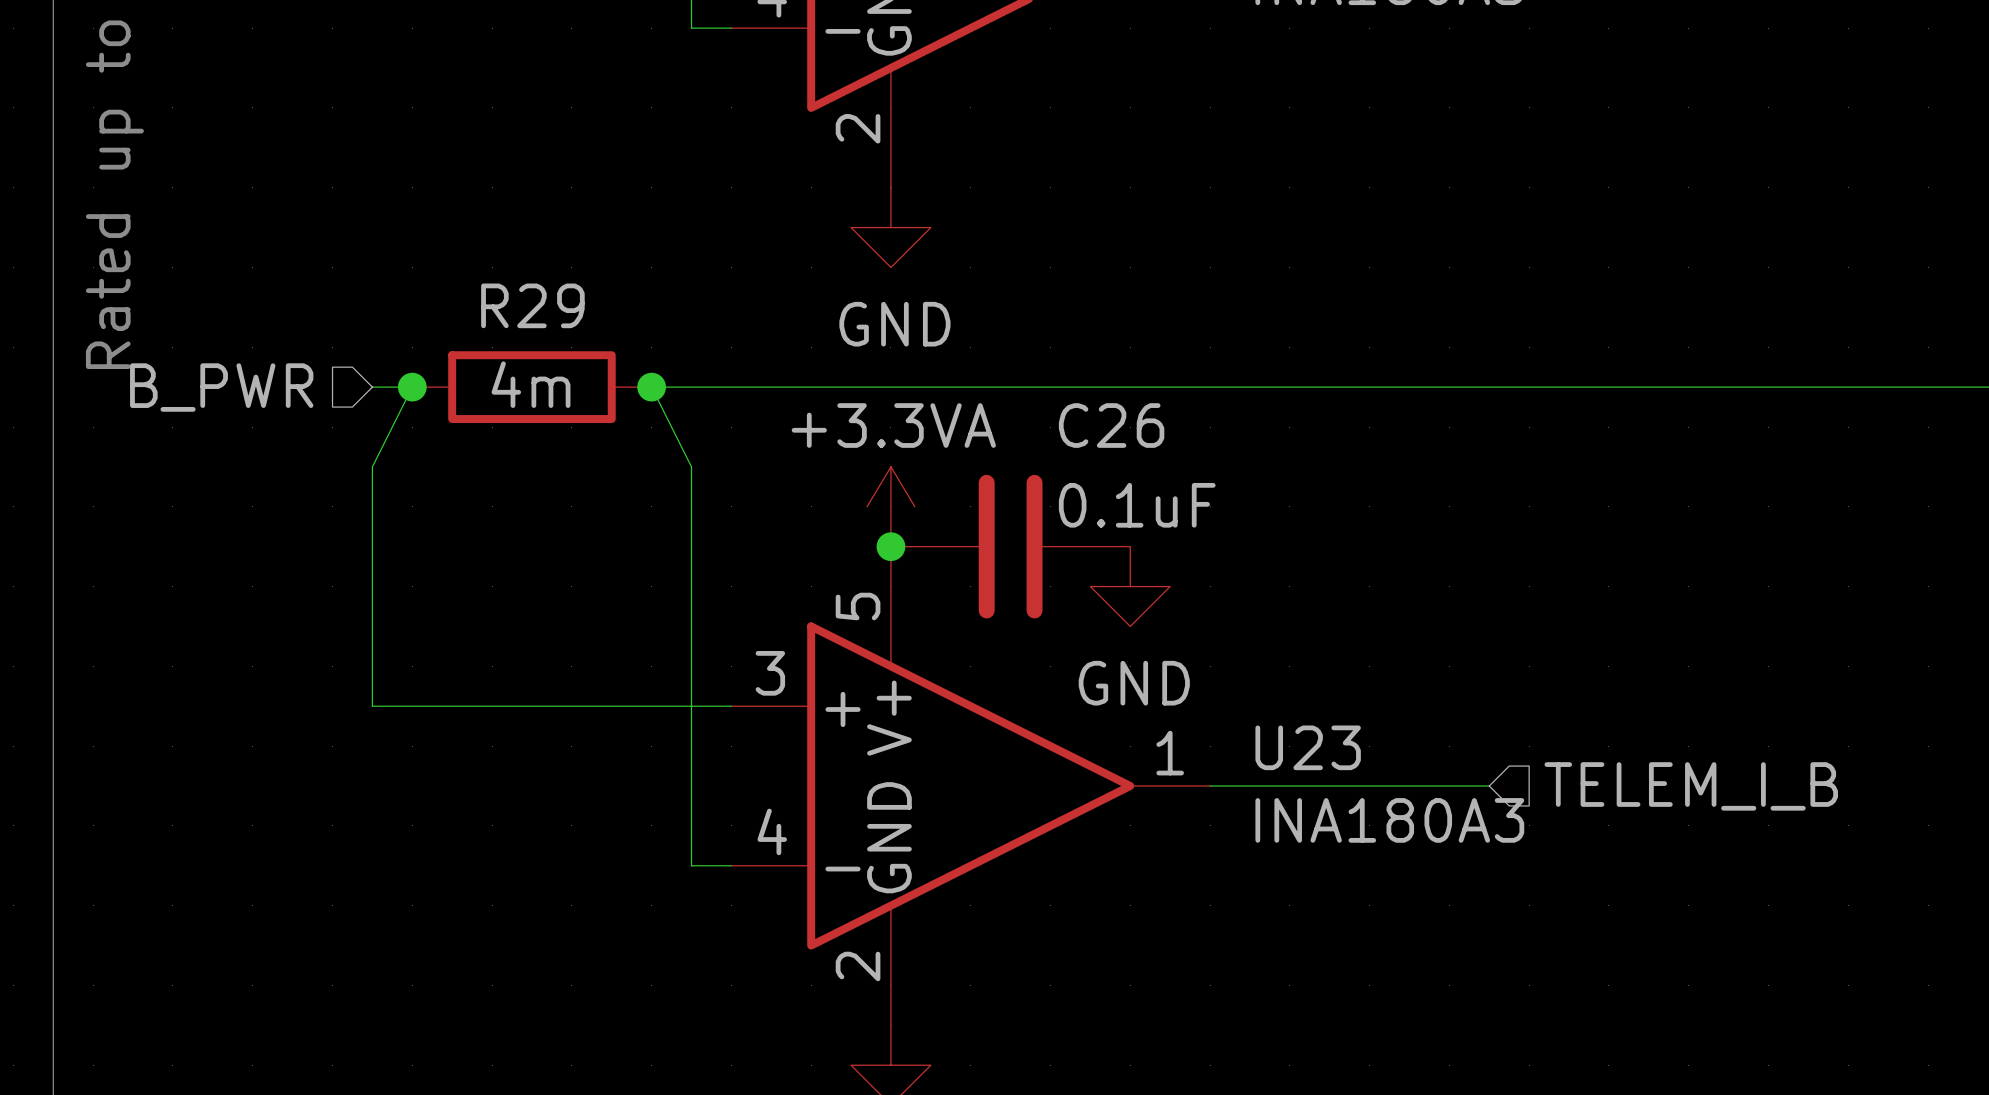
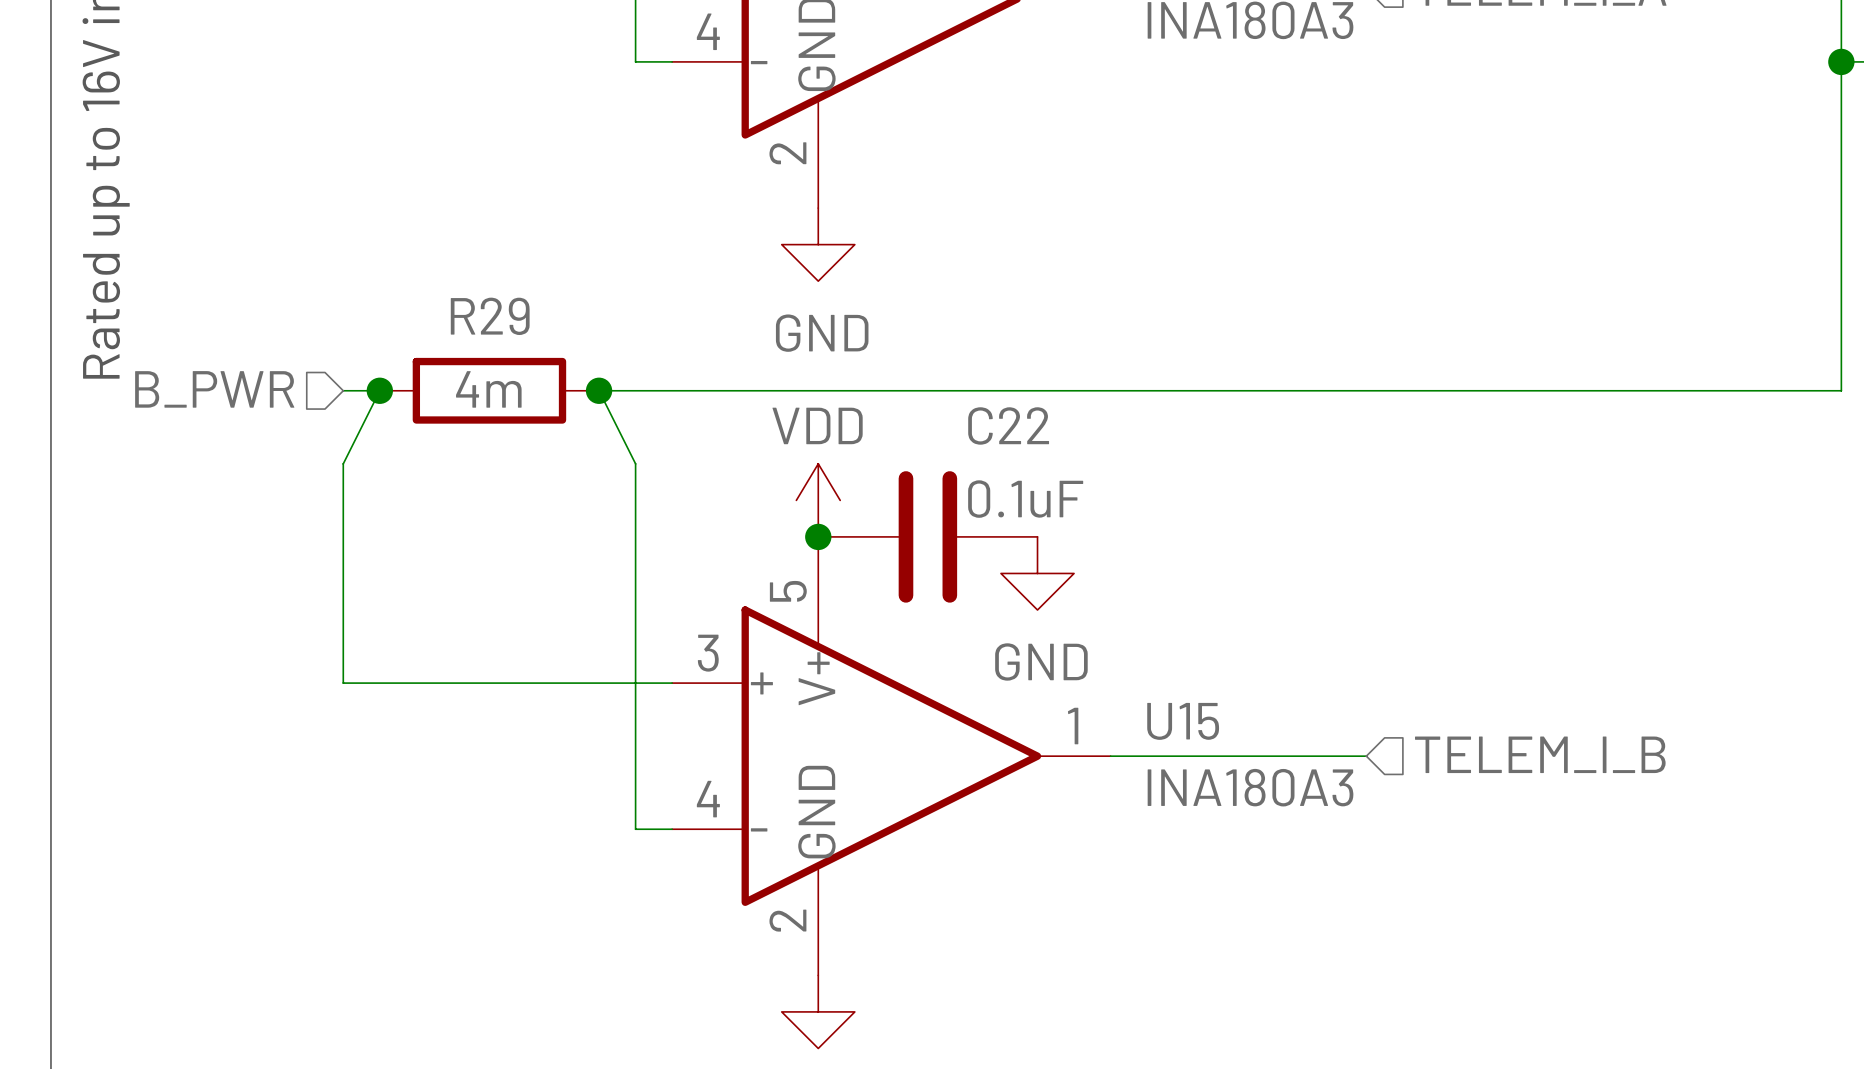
C26 name: C26 (1111, 425) -> C22 (1008, 425)
power symbol: +3.3VA (890, 506) -> VDD (818, 500)
U23 name: U23 (1308, 747) -> U15 (1183, 721)

